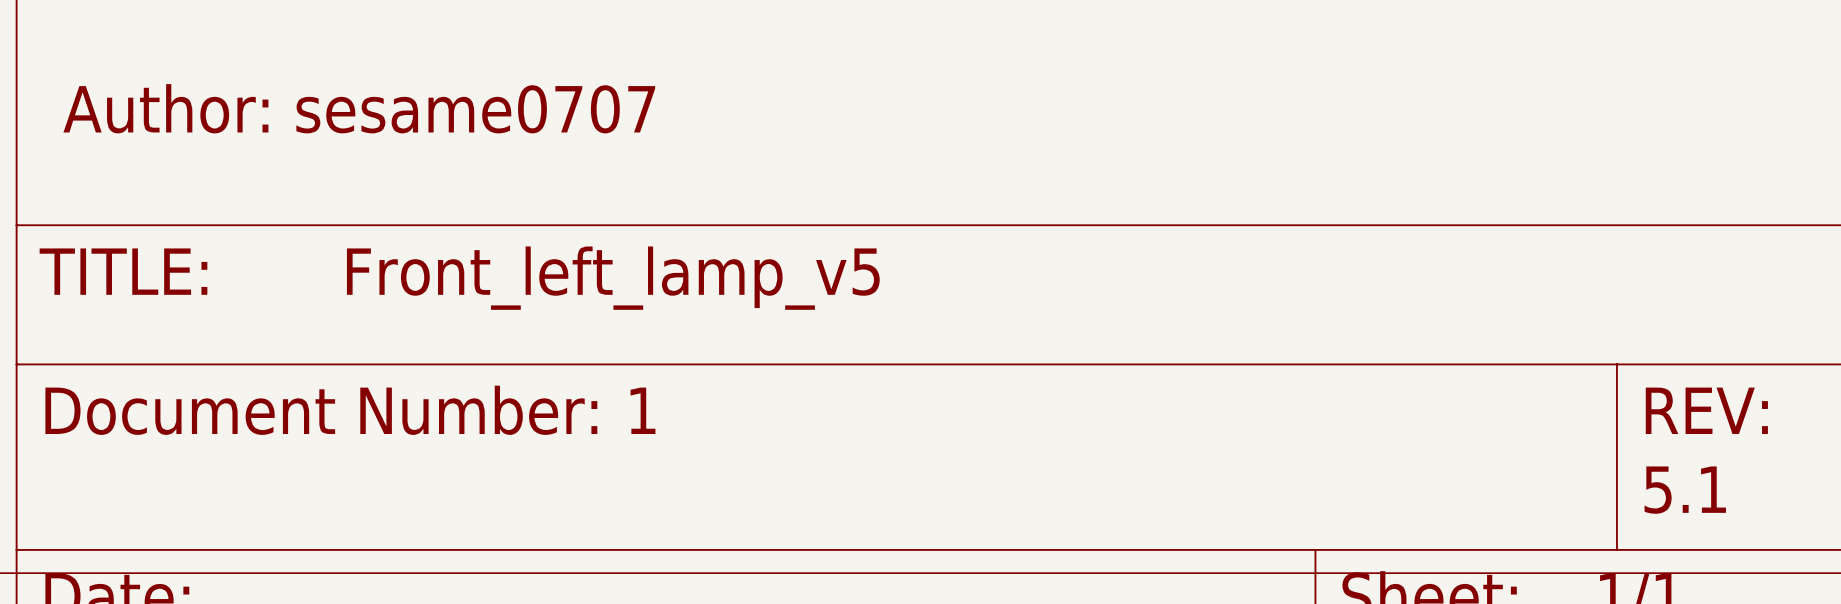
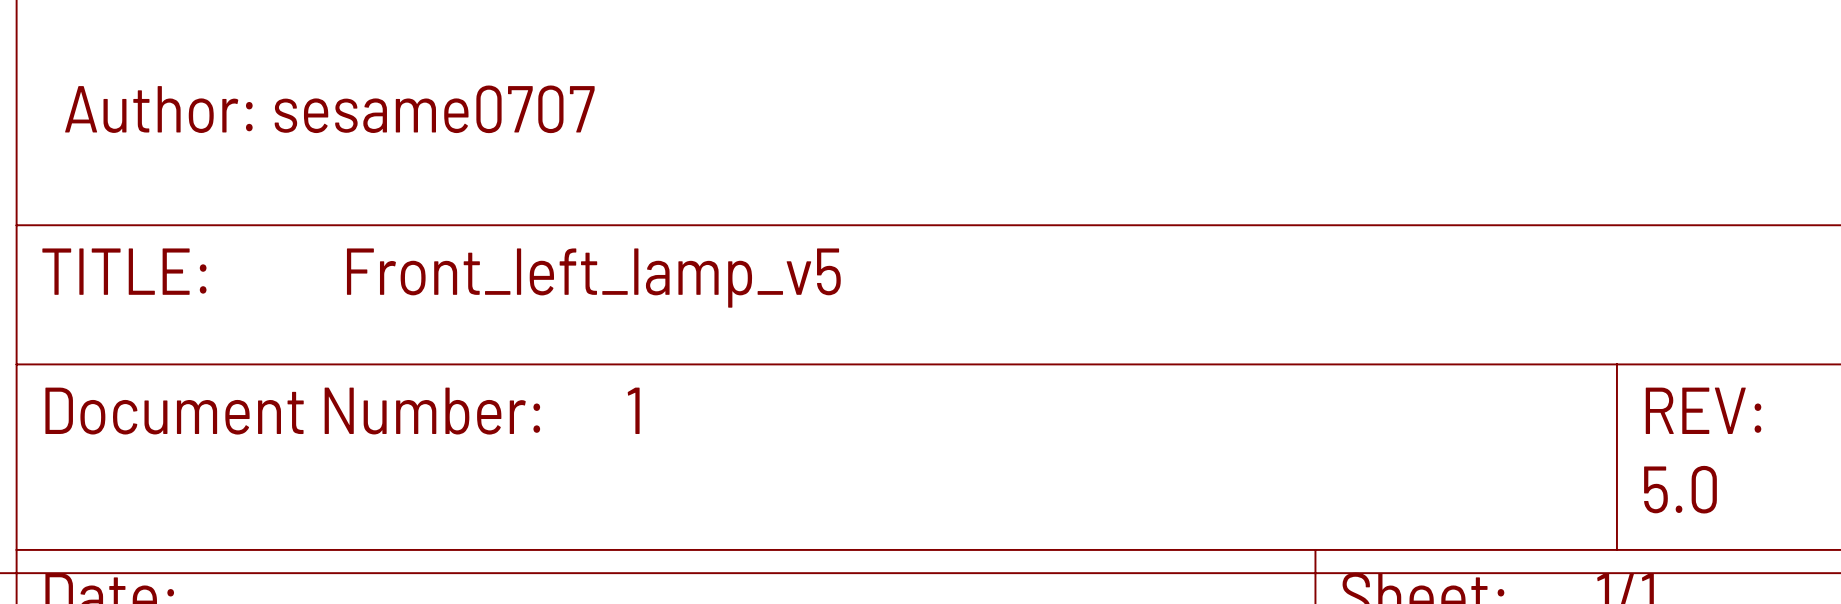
text: 5.1 (1685, 490) -> 5.0 (1680, 489)

